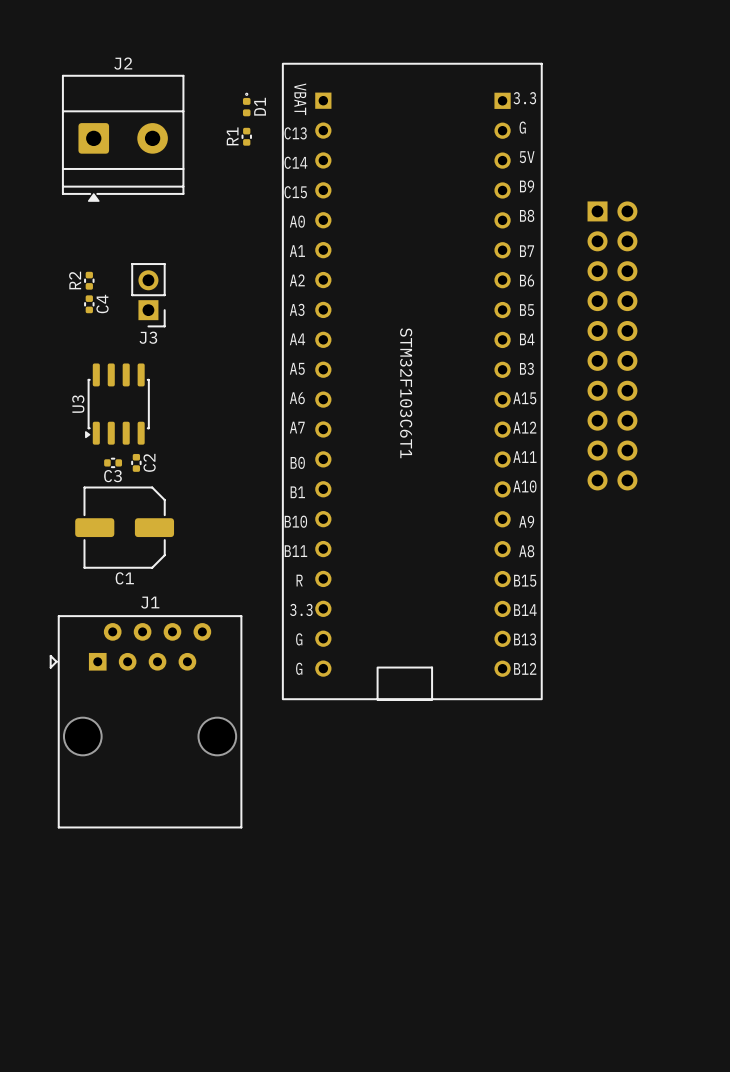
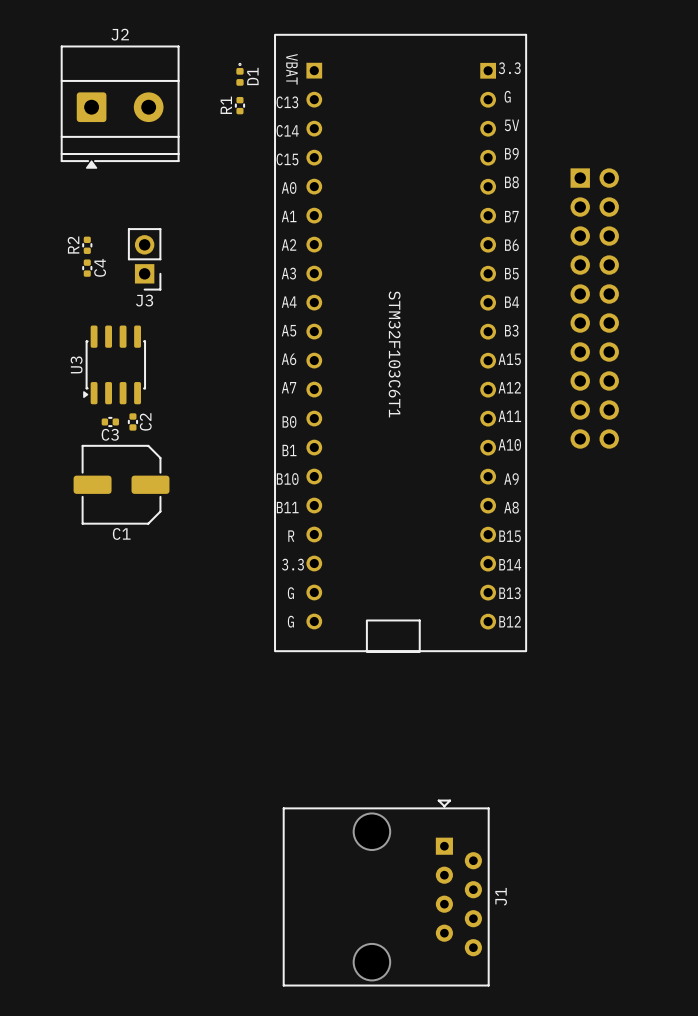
J1 rotation: 0° (146, 721) -> 90° clockwise (386, 893)
J1 position: (146, 721) -> (386, 893)

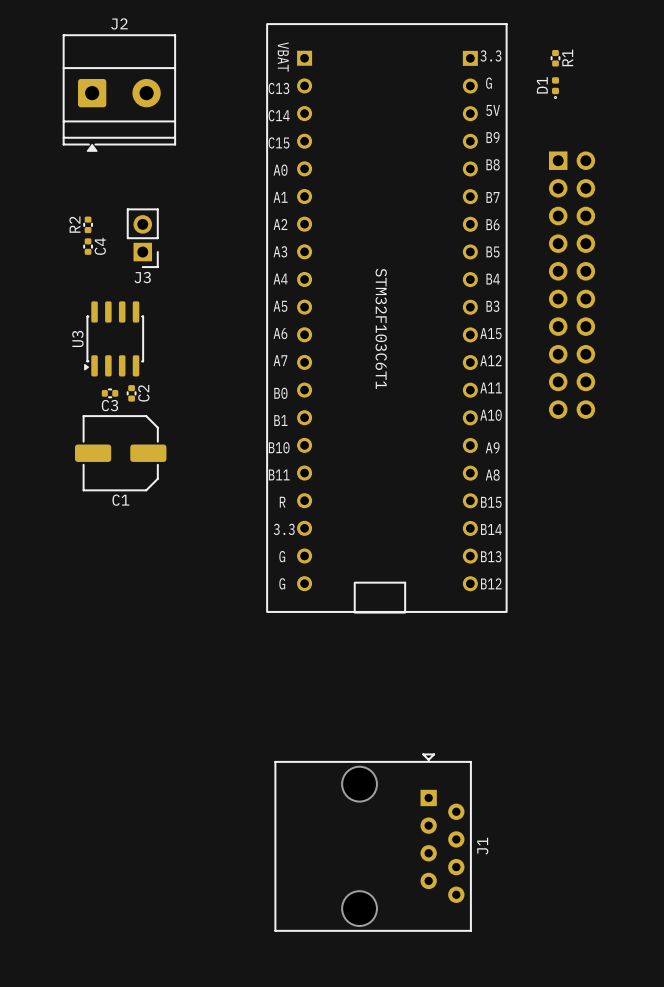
D1 rotation: 0° (239, 74) -> 180° (555, 87)
D1 position: (239, 74) -> (555, 87)
R1 name position: R1 (226, 105) -> R1 (567, 57)
R1 position: (239, 105) -> (555, 58)

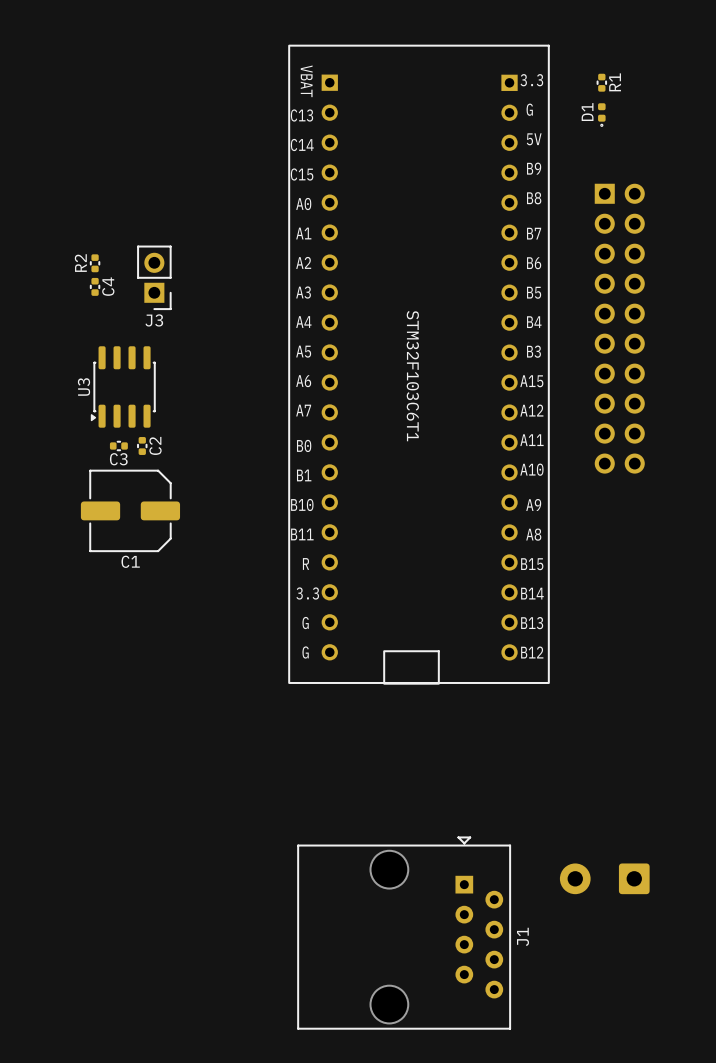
J2: (119, 93) -> none
part: none -> (604, 878)

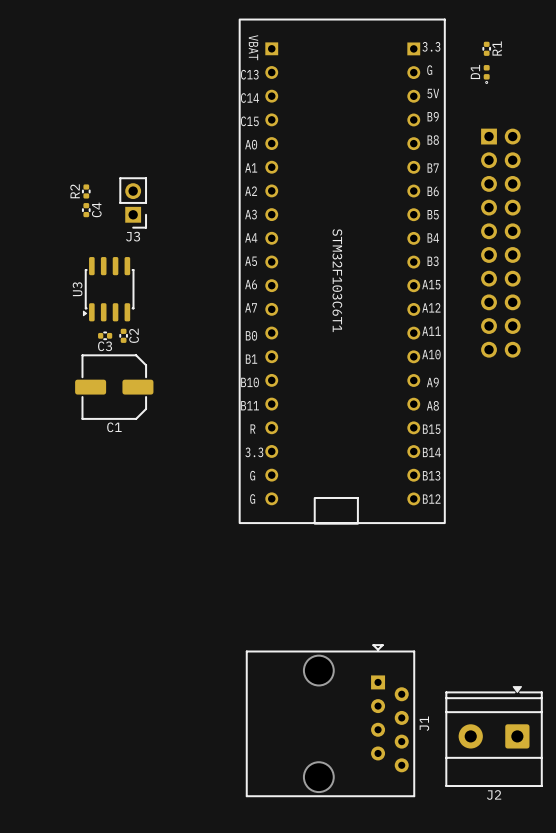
J2 side: bottom (604, 878) -> top (494, 736)

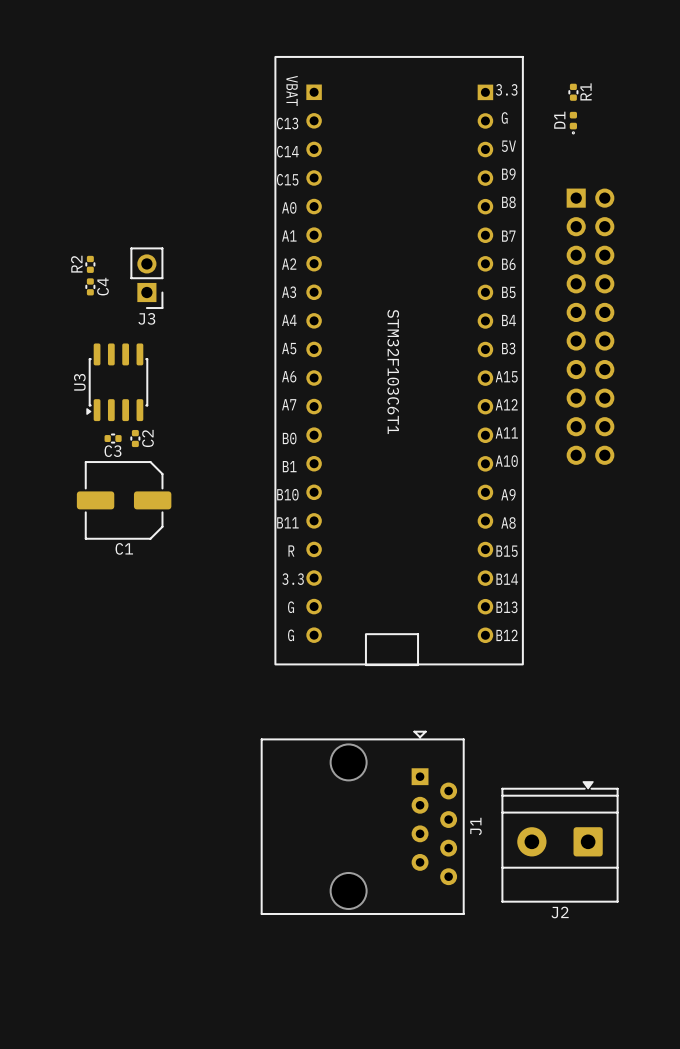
J1 position: (330, 720) -> (362, 822)
J2 position: (494, 736) -> (560, 841)

